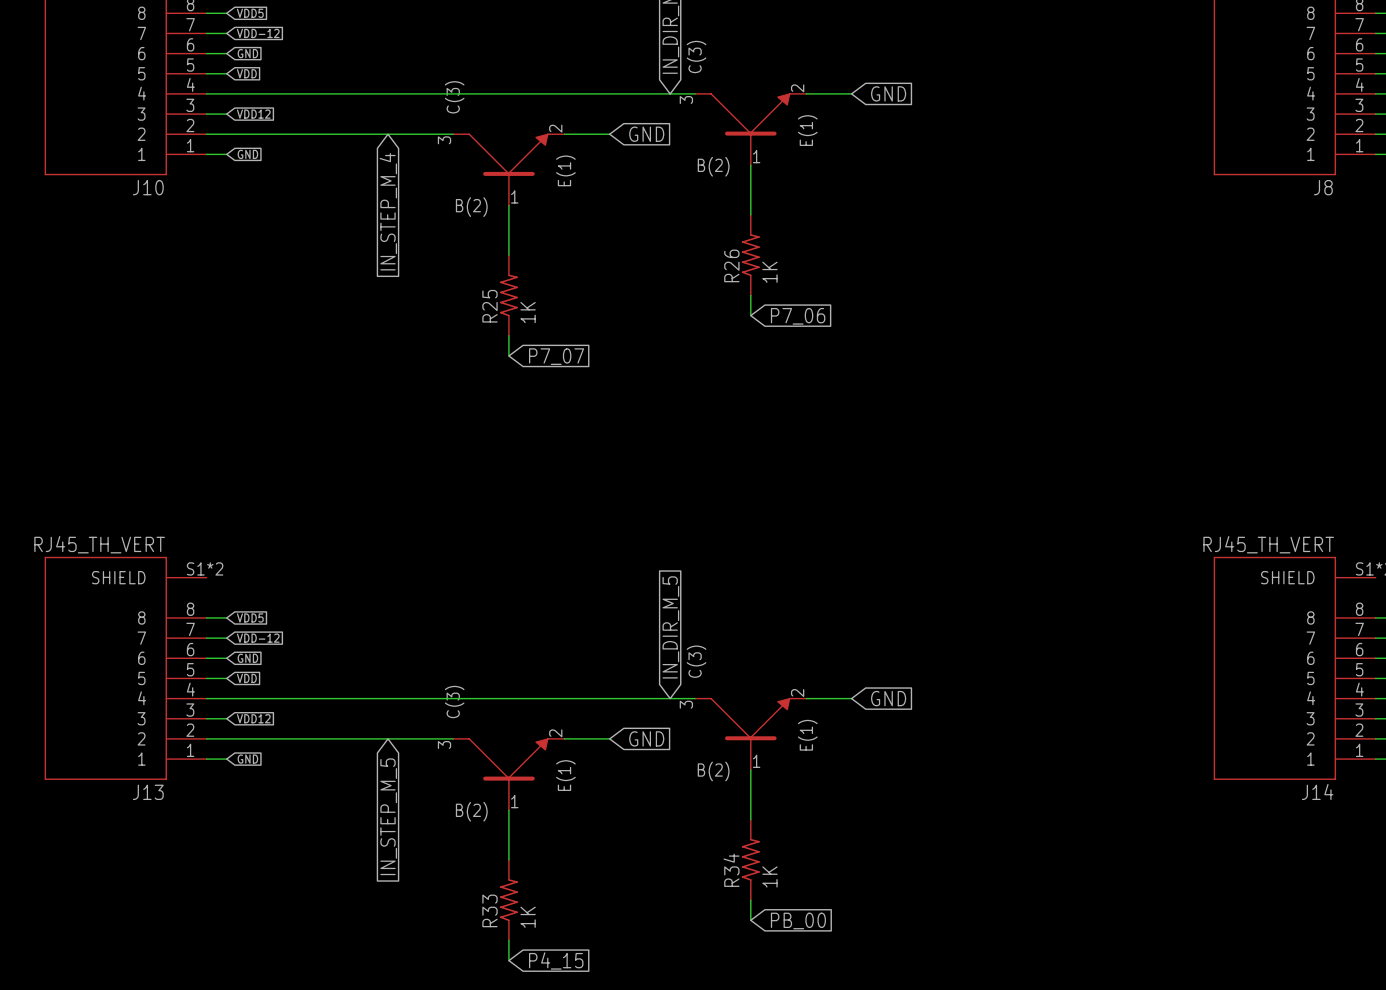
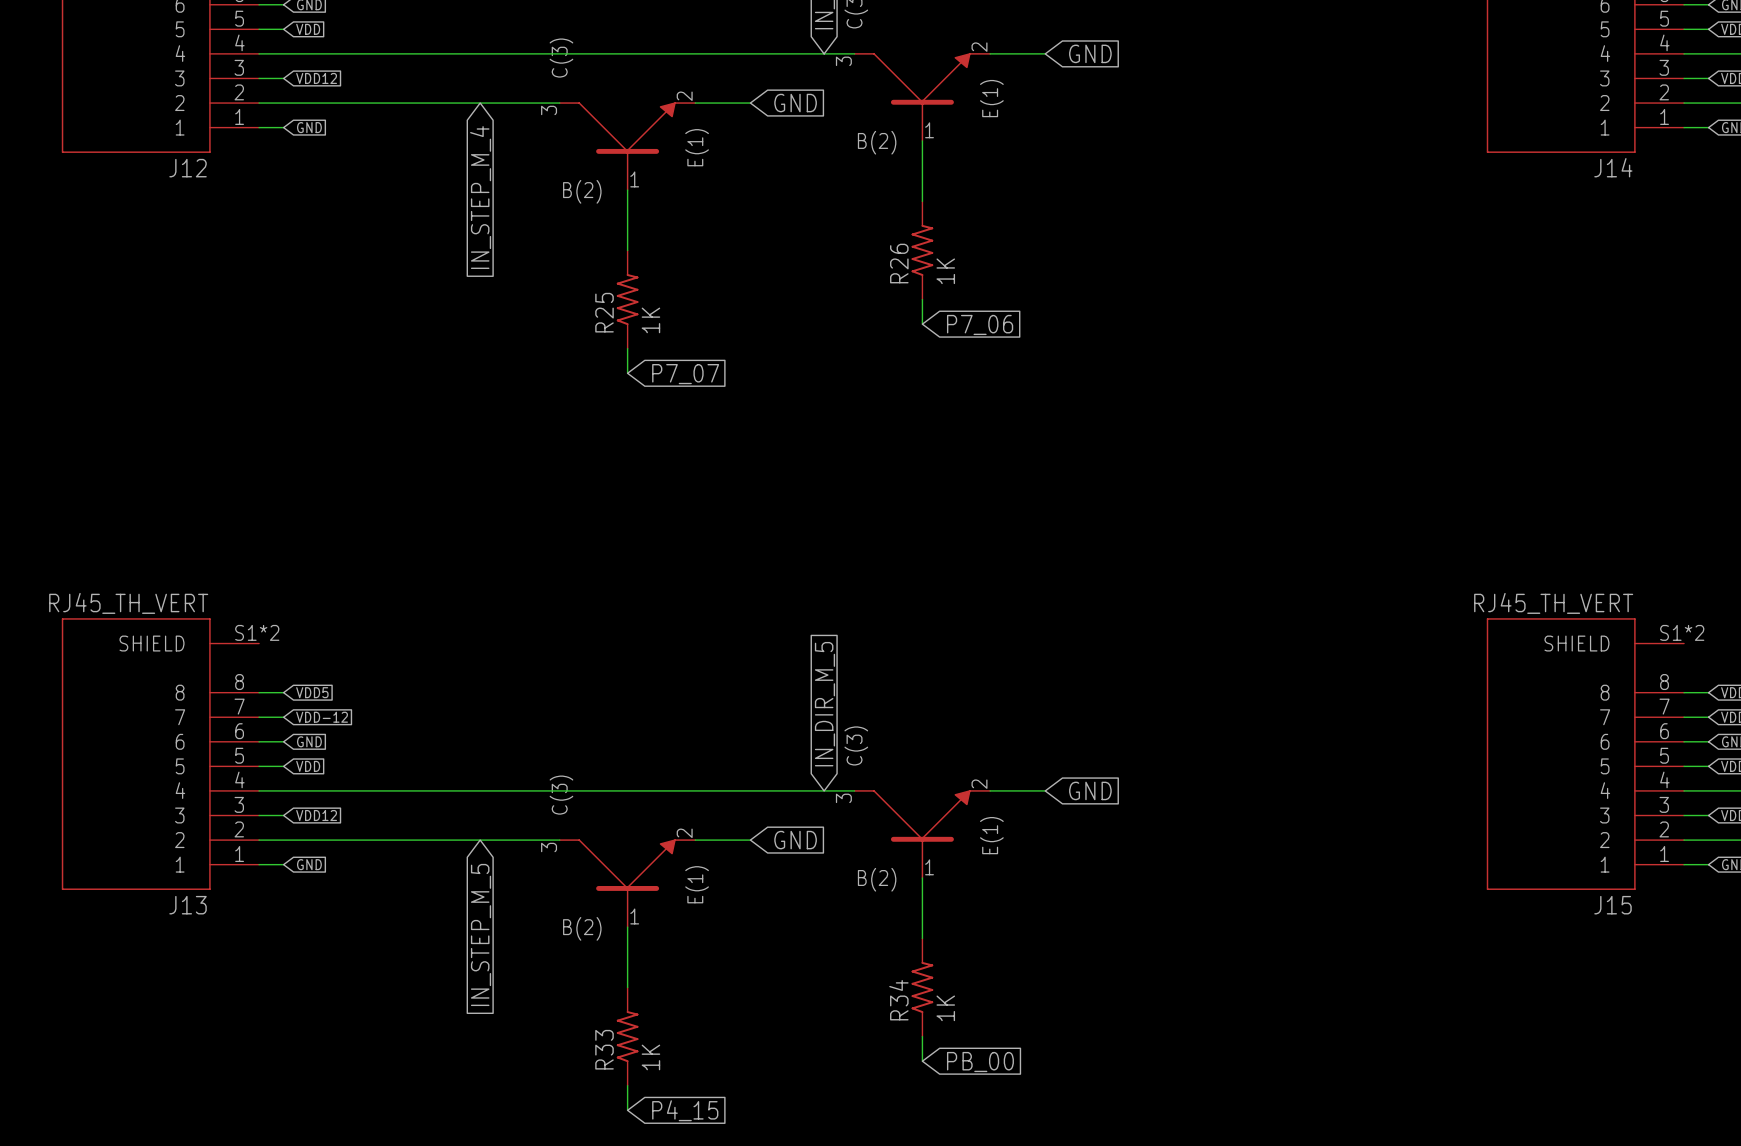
J10 name: J10 (148, 187) -> J12 (188, 168)
J8 name: J8 (1323, 187) -> J14 (1613, 167)
J14 name: J14 (1317, 791) -> J15 (1612, 905)

